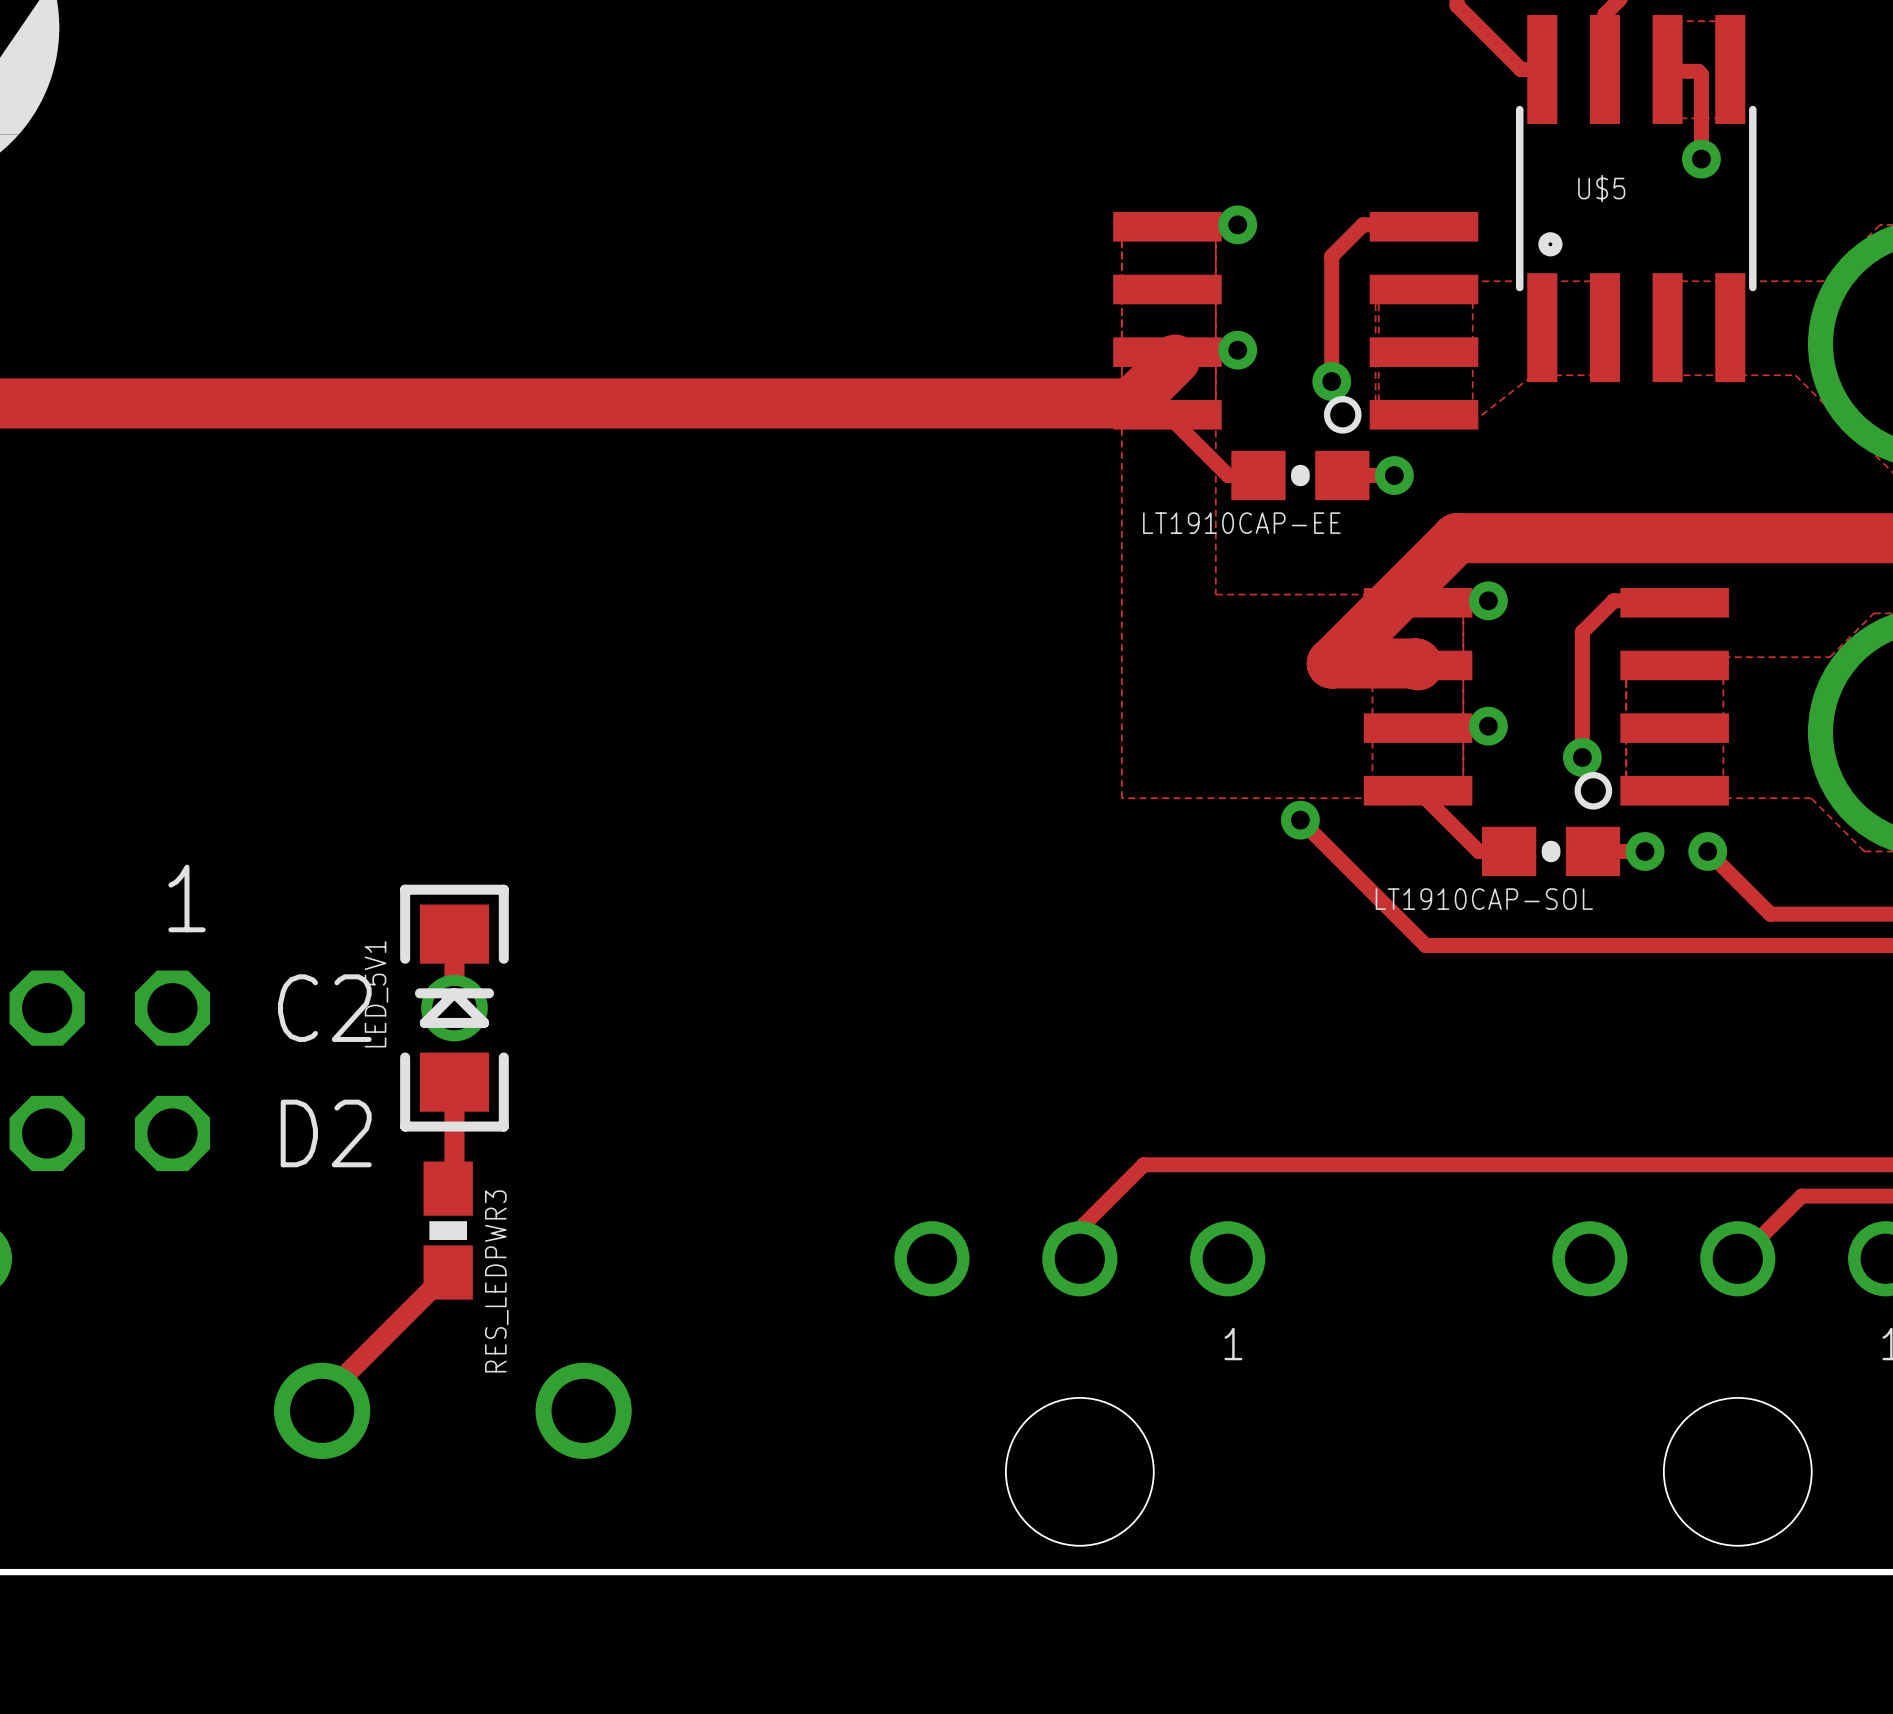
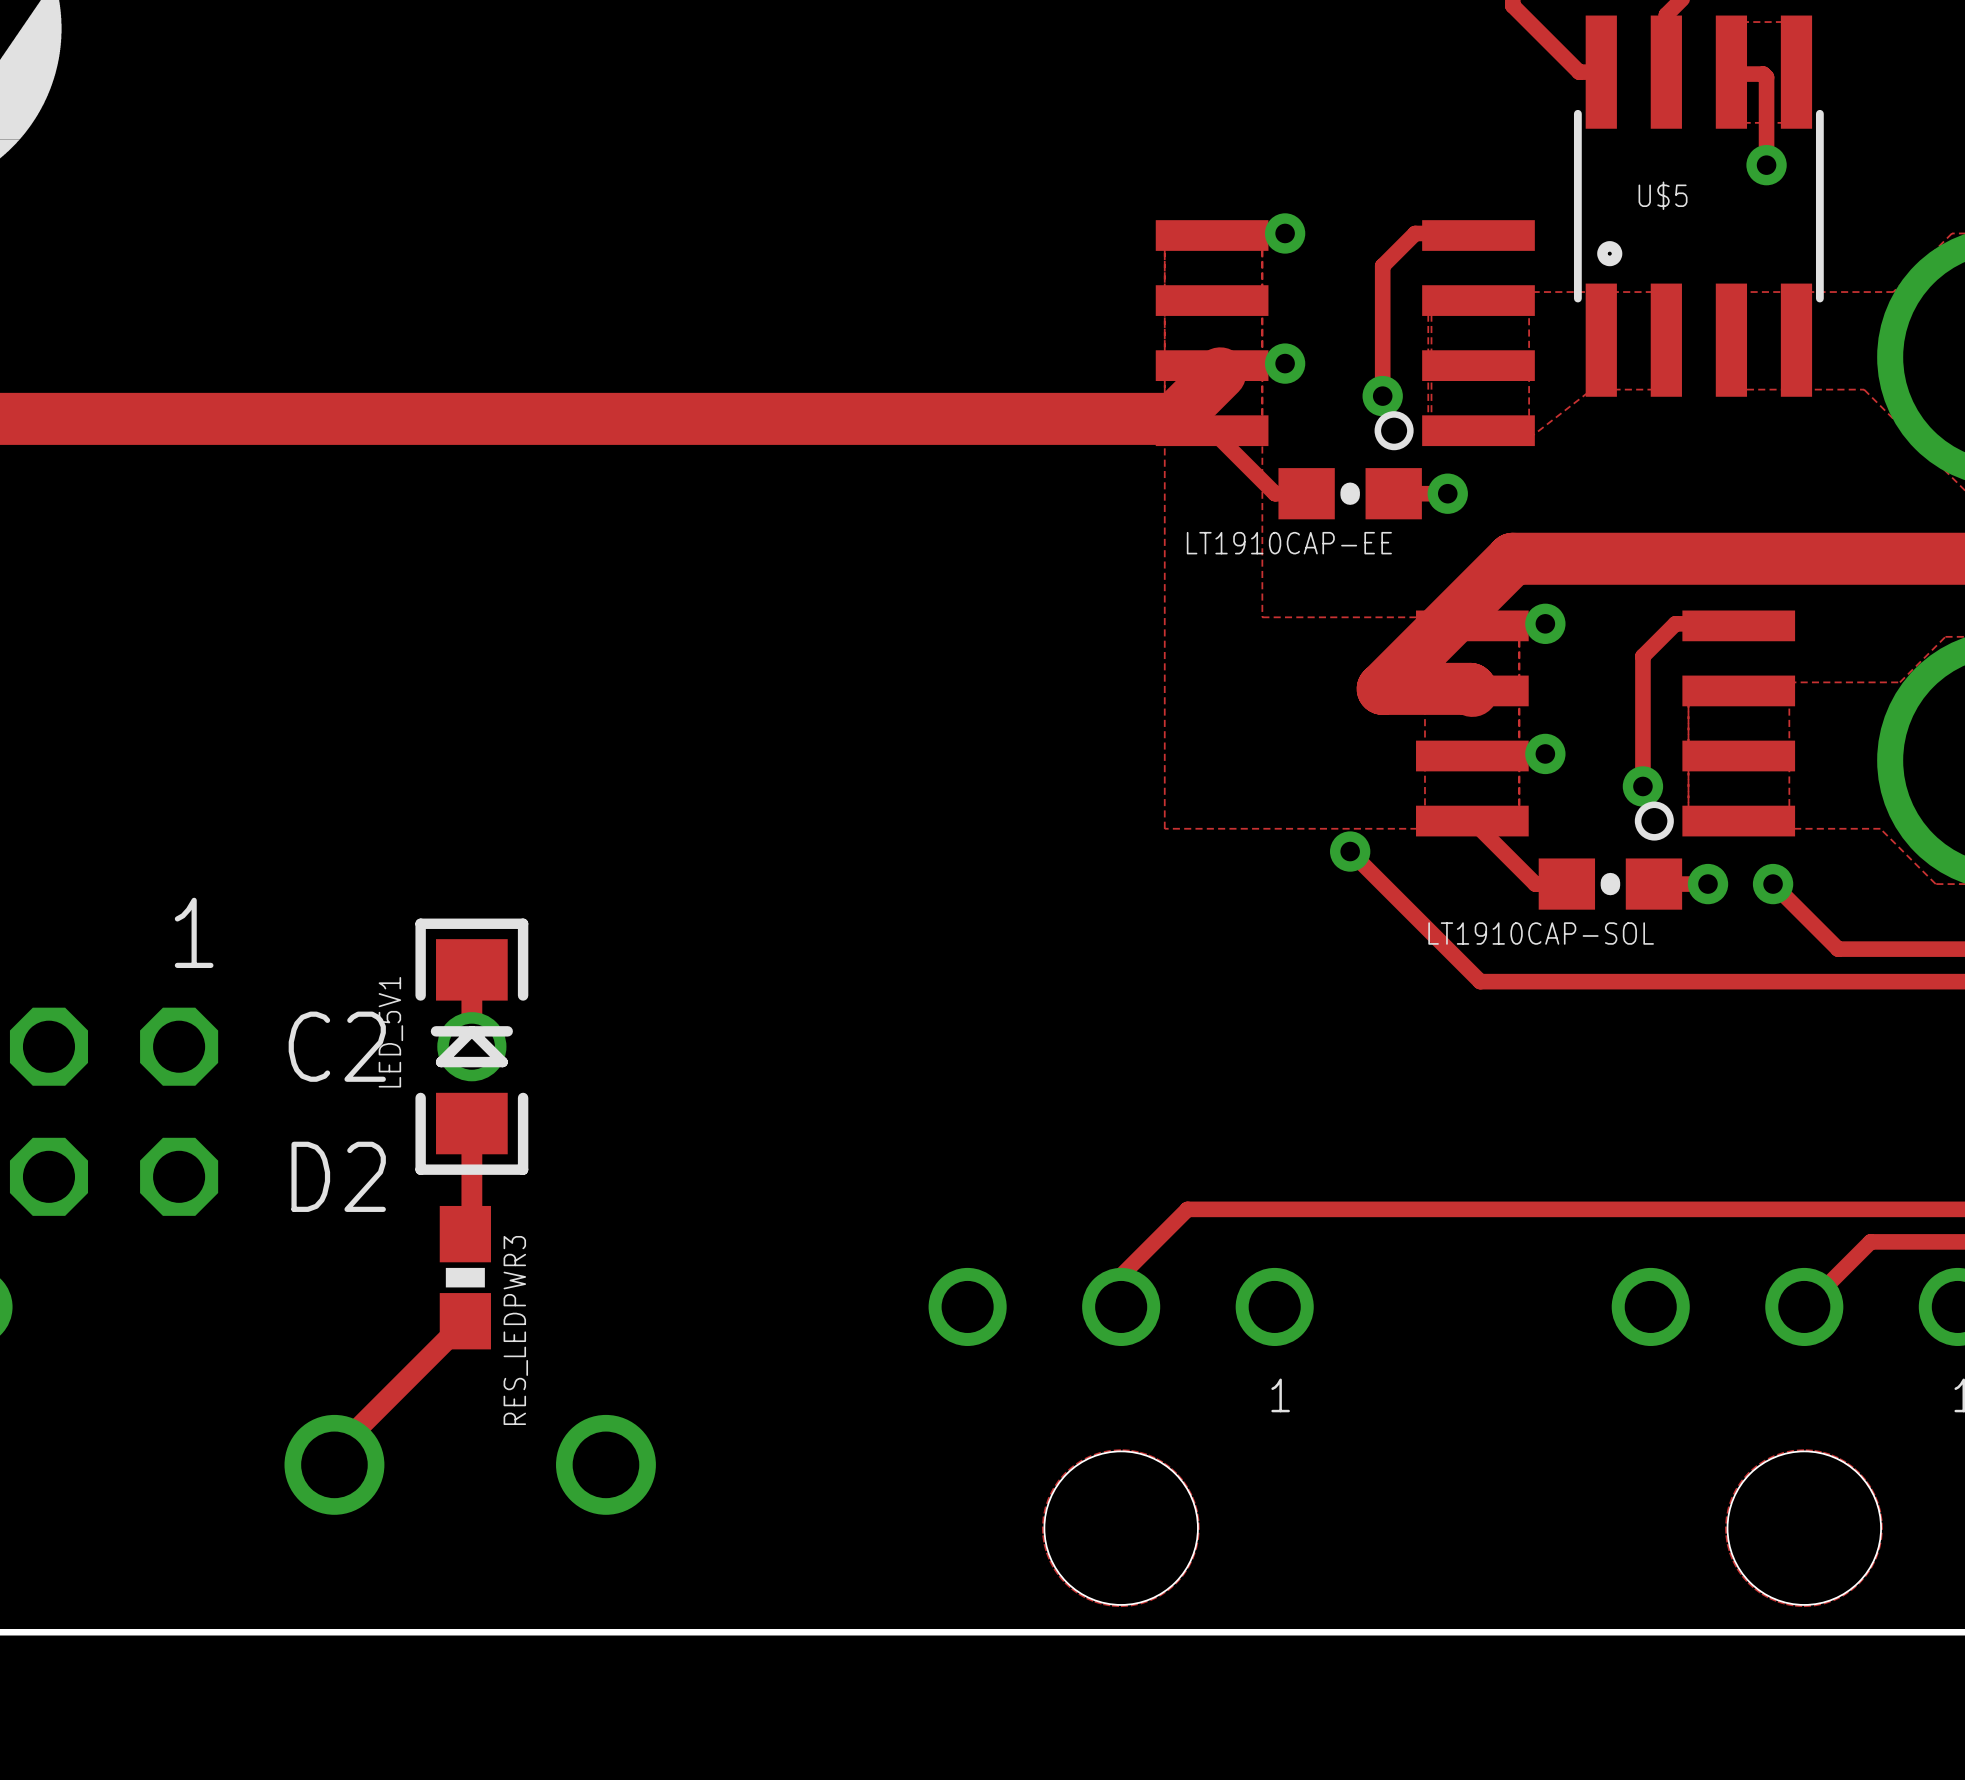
zone outline: none -> (1120, 1450) (1138, 1452) (1155, 1458) (1176, 1473) (1191, 1495) (1197, 1512) (1198, 1529) (1192, 1559) (1175, 1583) (1150, 1600) (1120, 1606) (1094, 1601) (1078, 1593) (1065, 1582) (1050, 1560) (1044, 1544) (1042, 1526) (1049, 1497) (1066, 1472) (1091, 1455) (1120, 1450)
zone outline: none -> (1803, 1450) (1821, 1452) (1838, 1458) (1859, 1473) (1874, 1495) (1880, 1512) (1882, 1529) (1875, 1559) (1858, 1583) (1833, 1600) (1803, 1606) (1777, 1601) (1761, 1593) (1748, 1582) (1737, 1568) (1729, 1552) (1725, 1526) (1732, 1497) (1749, 1472) (1774, 1455) (1803, 1450)

